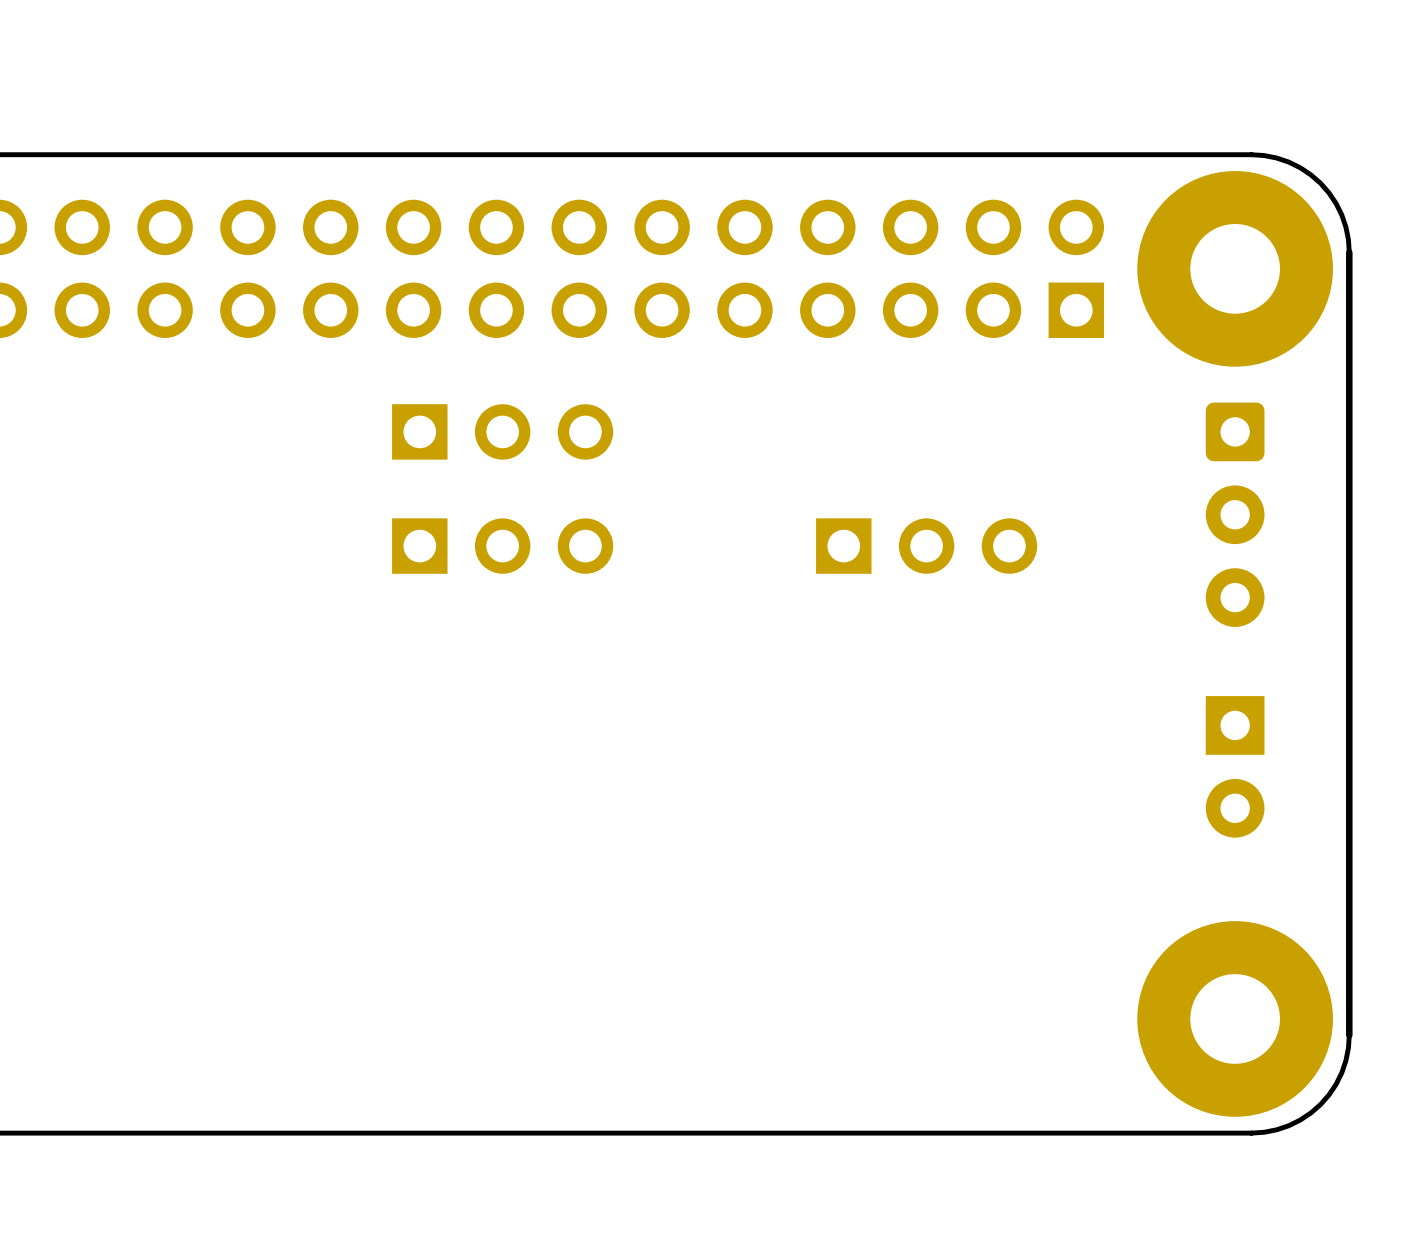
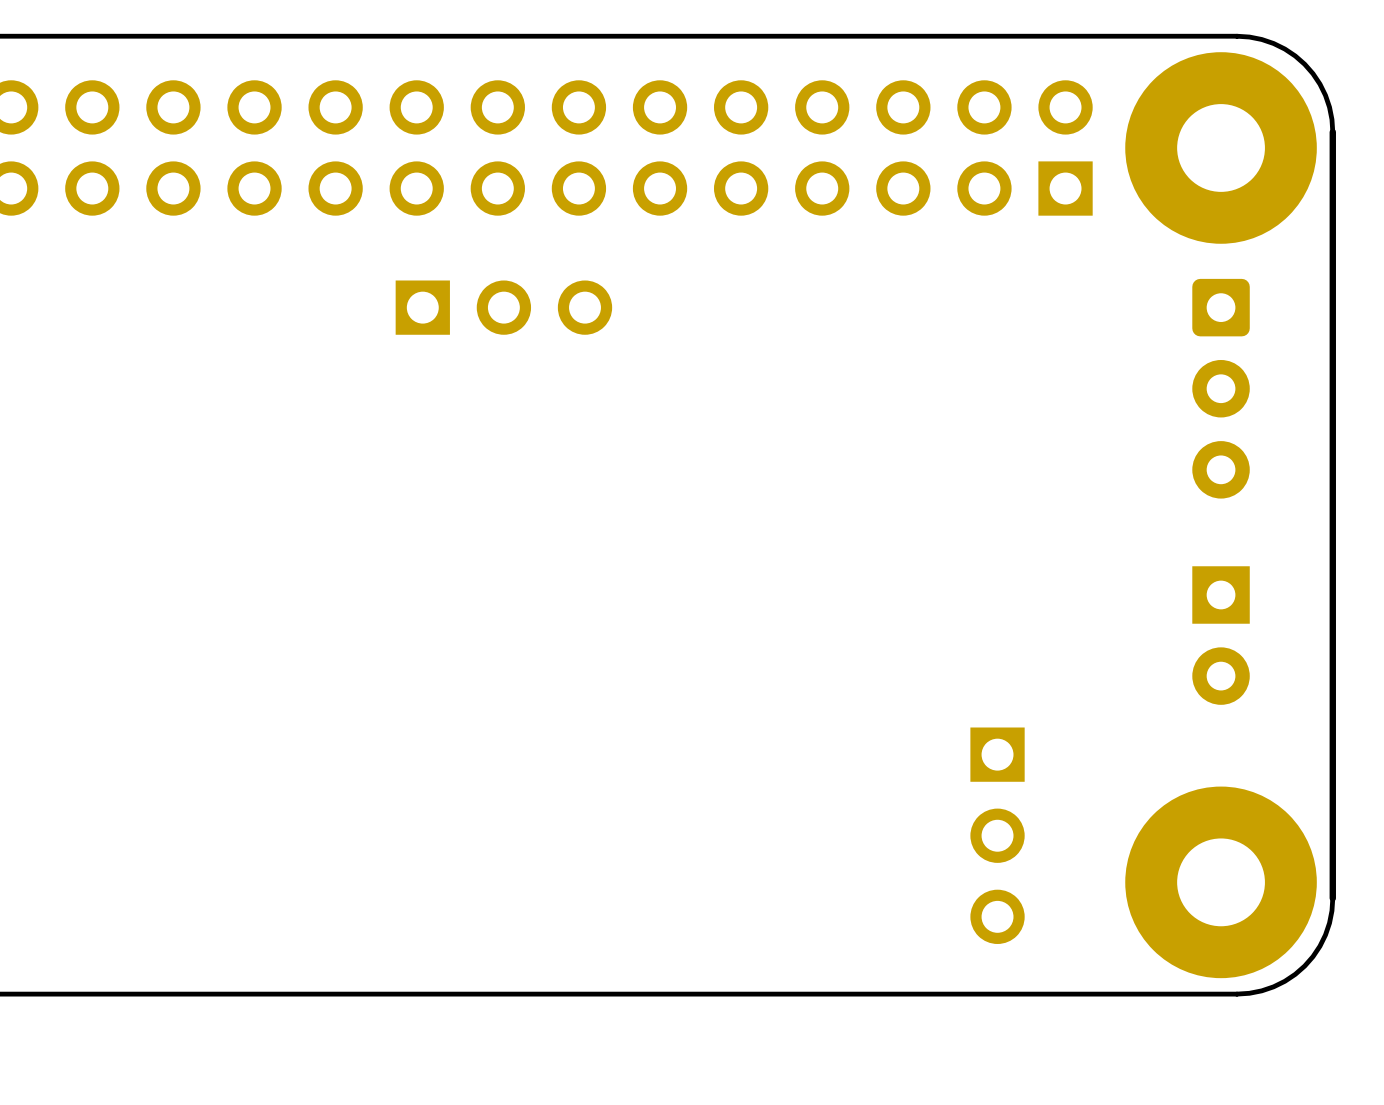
part: (502, 546) -> none
part: (926, 546) -> none
part: none -> (997, 835)

